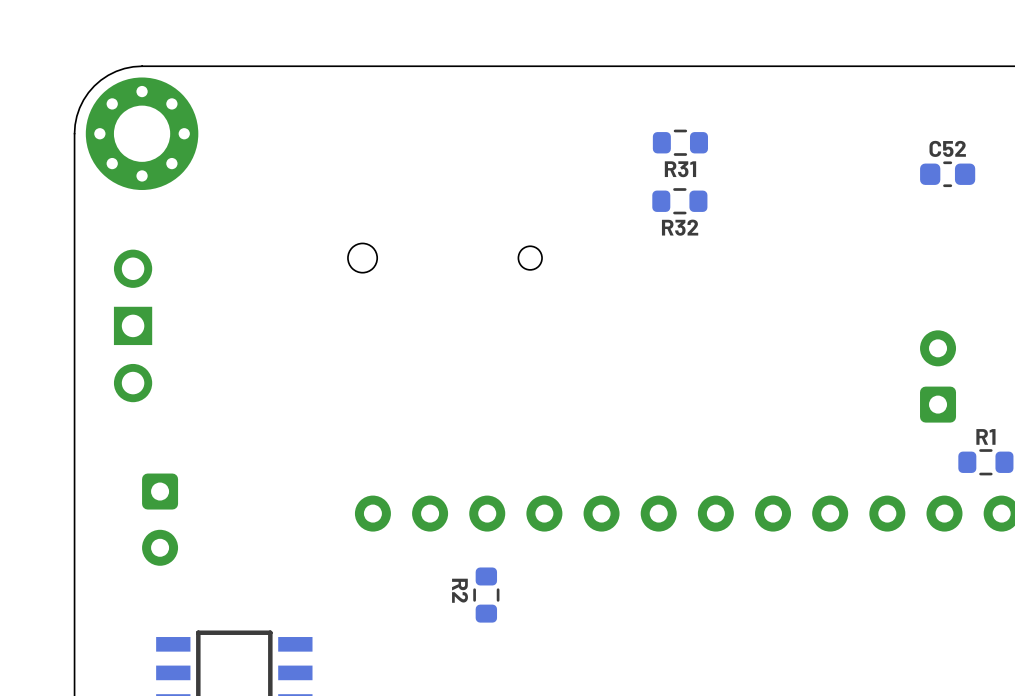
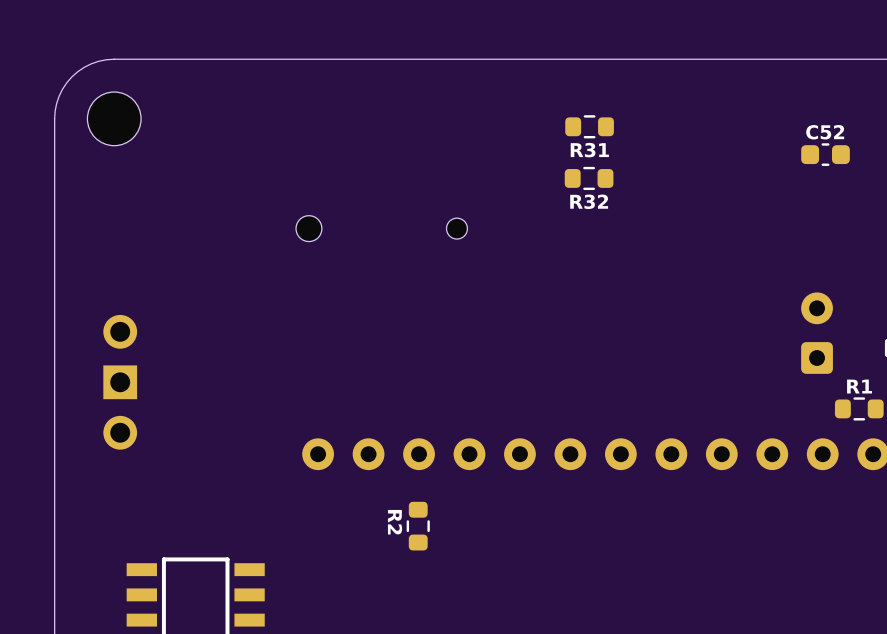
part footprint: [85, 77, 199, 191] -> [87, 92, 142, 146]
part position: (133, 325) -> (120, 382)
part: (160, 519) -> none

